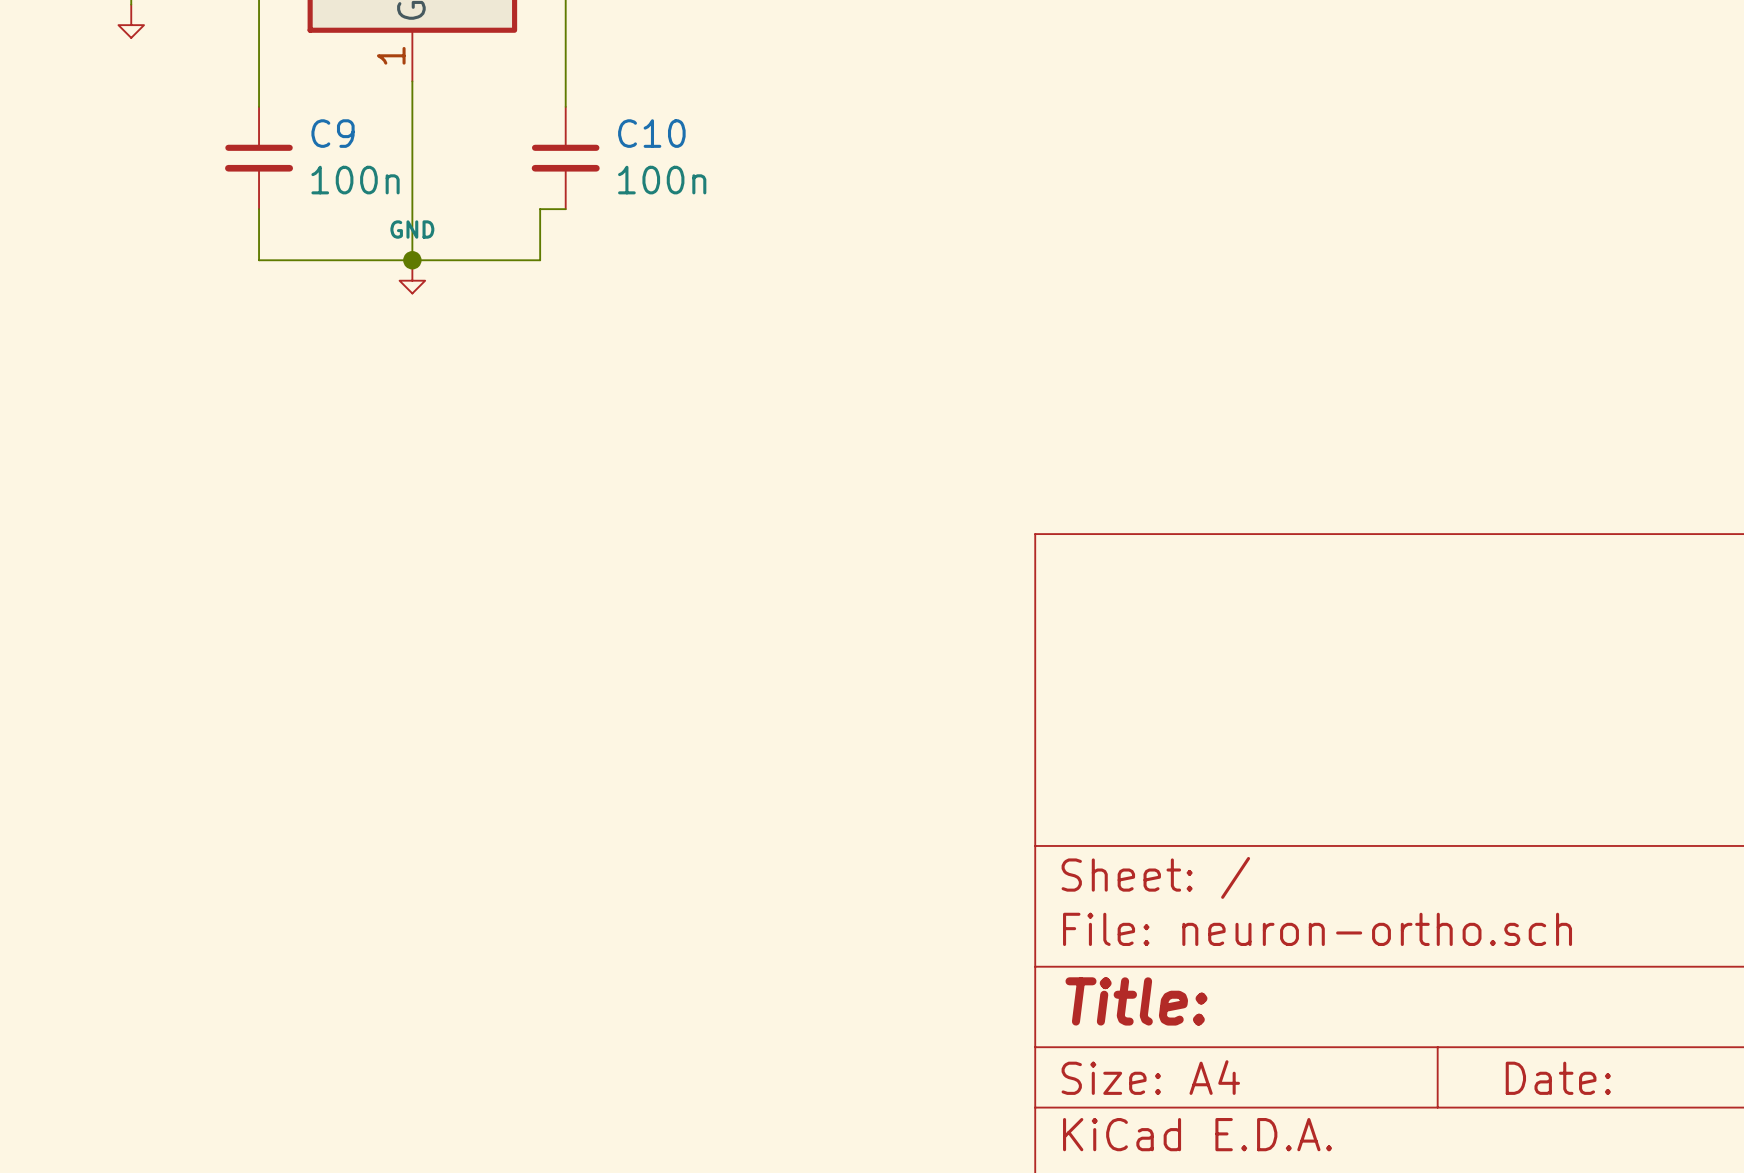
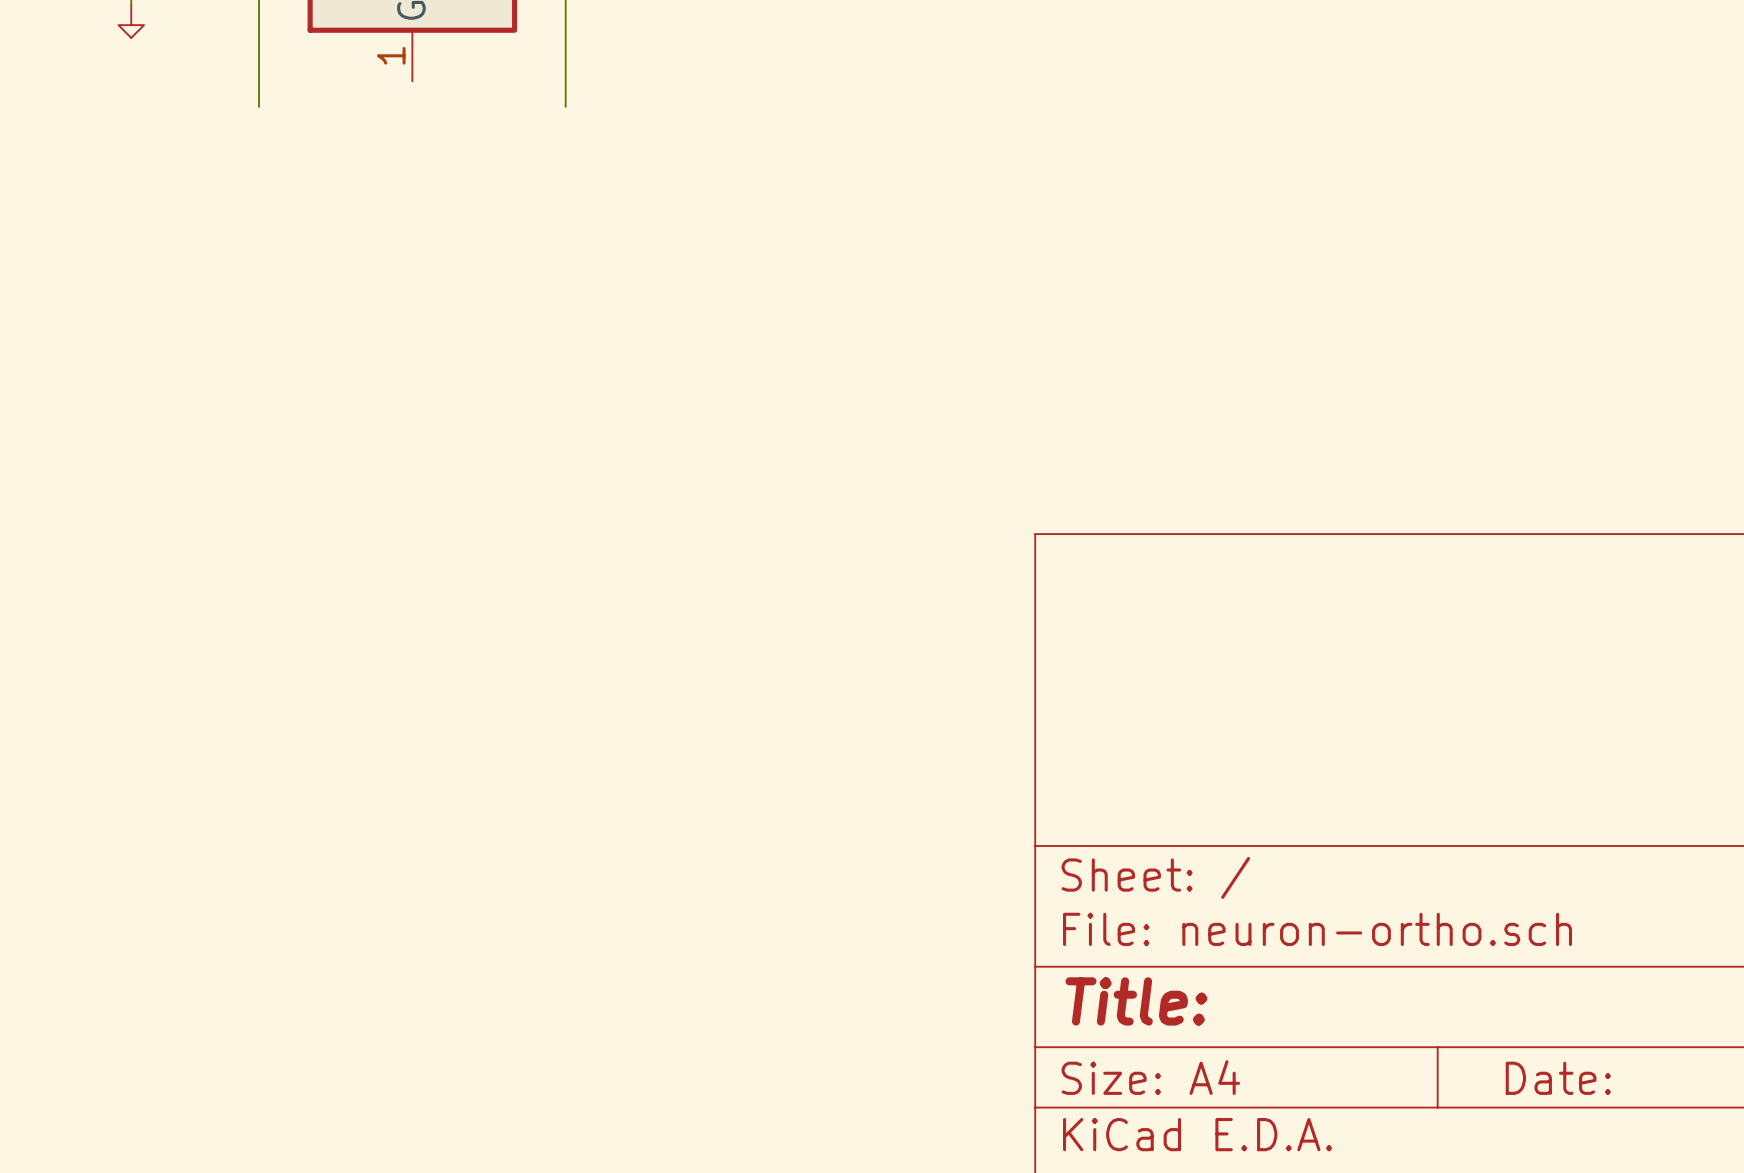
wire: (412, 81) (412, 260) -> none
C9: 100n (259, 158) -> none
C10: 100n (565, 158) -> none
wire: (259, 209) (259, 260) (540, 260) (540, 209) (565, 209) -> none
junction: (412, 260) -> none
power symbol: GND (412, 276) -> none

